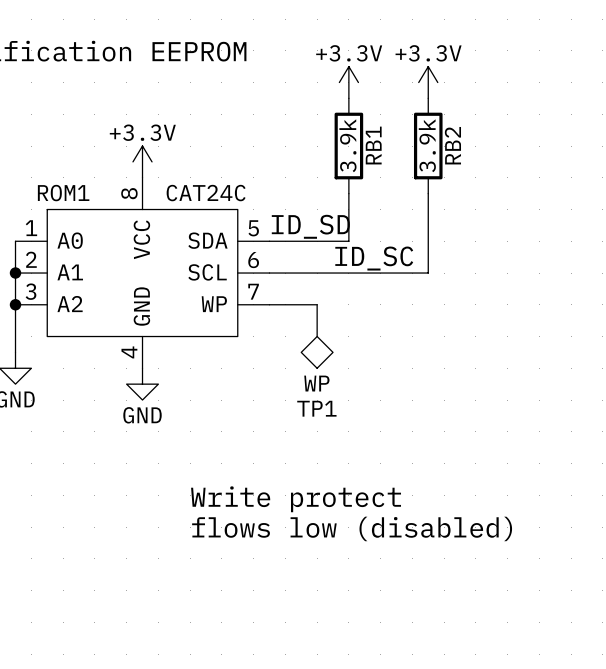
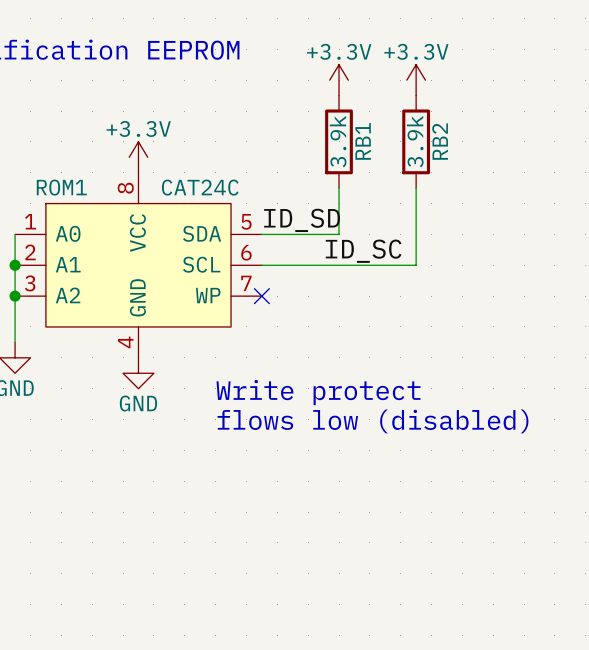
wire: (269, 304) (317, 304) -> none
no-connect mark: none -> (261, 296)
TP1: WP (317, 336) -> none
text position: Write protect (296, 499) -> Write protect (318, 392)
text position: flows low (disabled) (352, 528) -> flows low (disabled) (372, 421)

